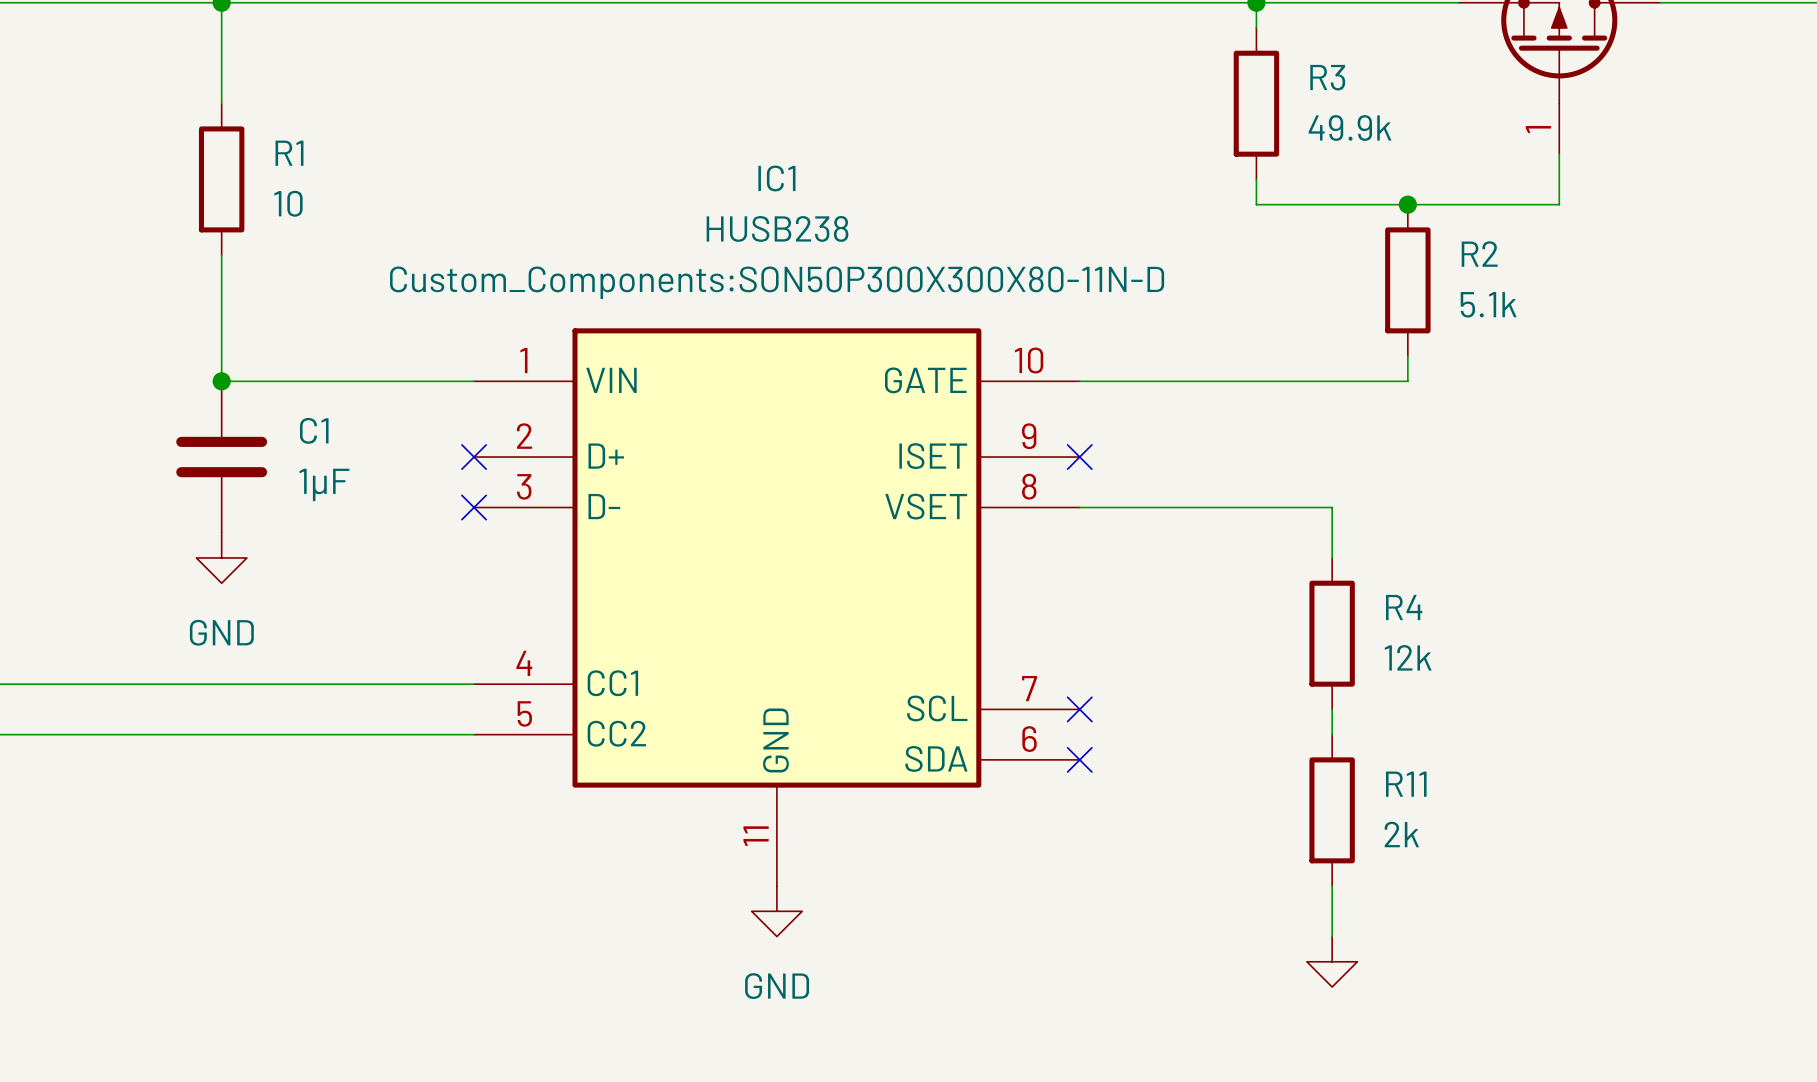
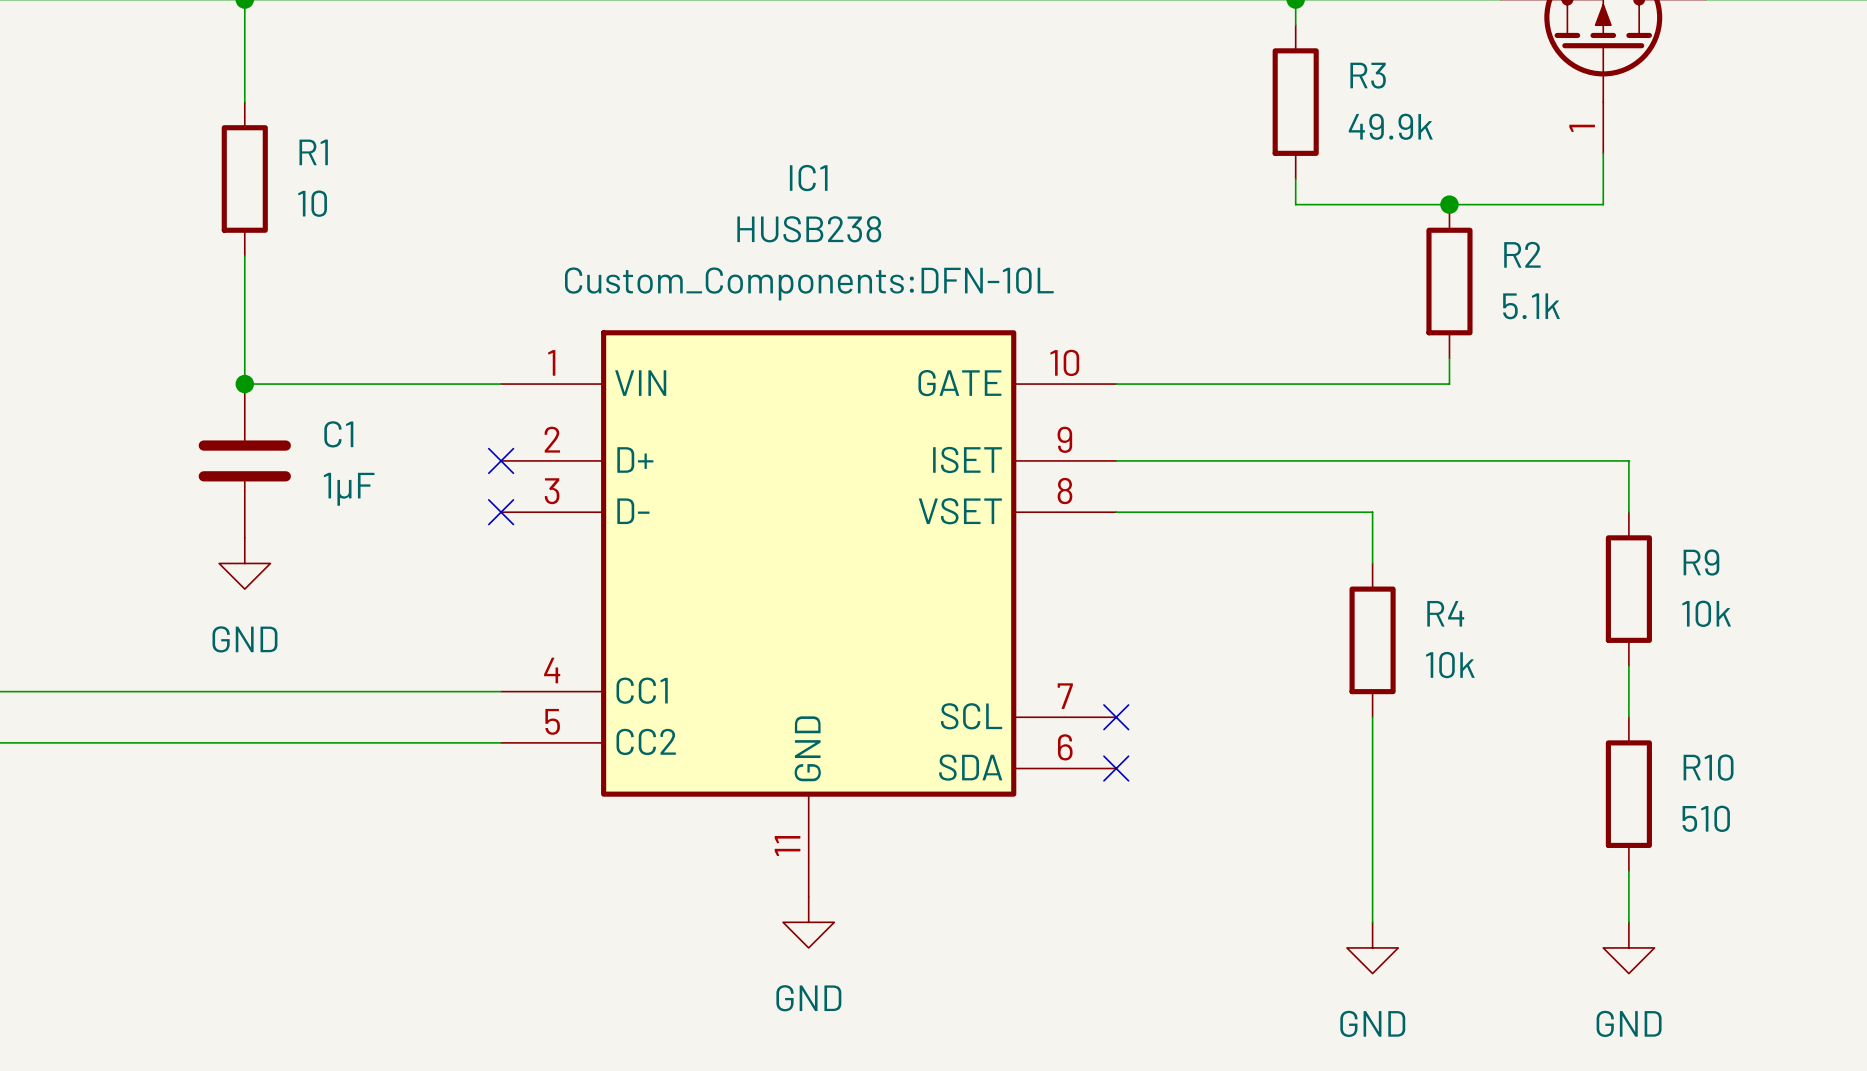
IC1 text: Custom_Components:SON50P300X300X80-11N-D (777, 282) -> Custom_Components:DFN-10L (809, 283)
wire: none -> (1116, 460) (1628, 460) (1628, 512)
no-connect mark: (1079, 457) -> none
R9: none -> 10k (1628, 589)
R4 value: 12k (1408, 657) -> 10k (1450, 665)
wire: none -> (1628, 665) (1628, 717)
wire: none -> (1372, 742) (1372, 896)
R10: none -> 510 (1628, 794)
R11: 2k (1332, 810) -> none
wire: none -> (1628, 871) (1628, 922)
power symbol: none -> GND (1372, 947)
power symbol: none -> GND (1628, 947)
power symbol: (1332, 961) -> none

